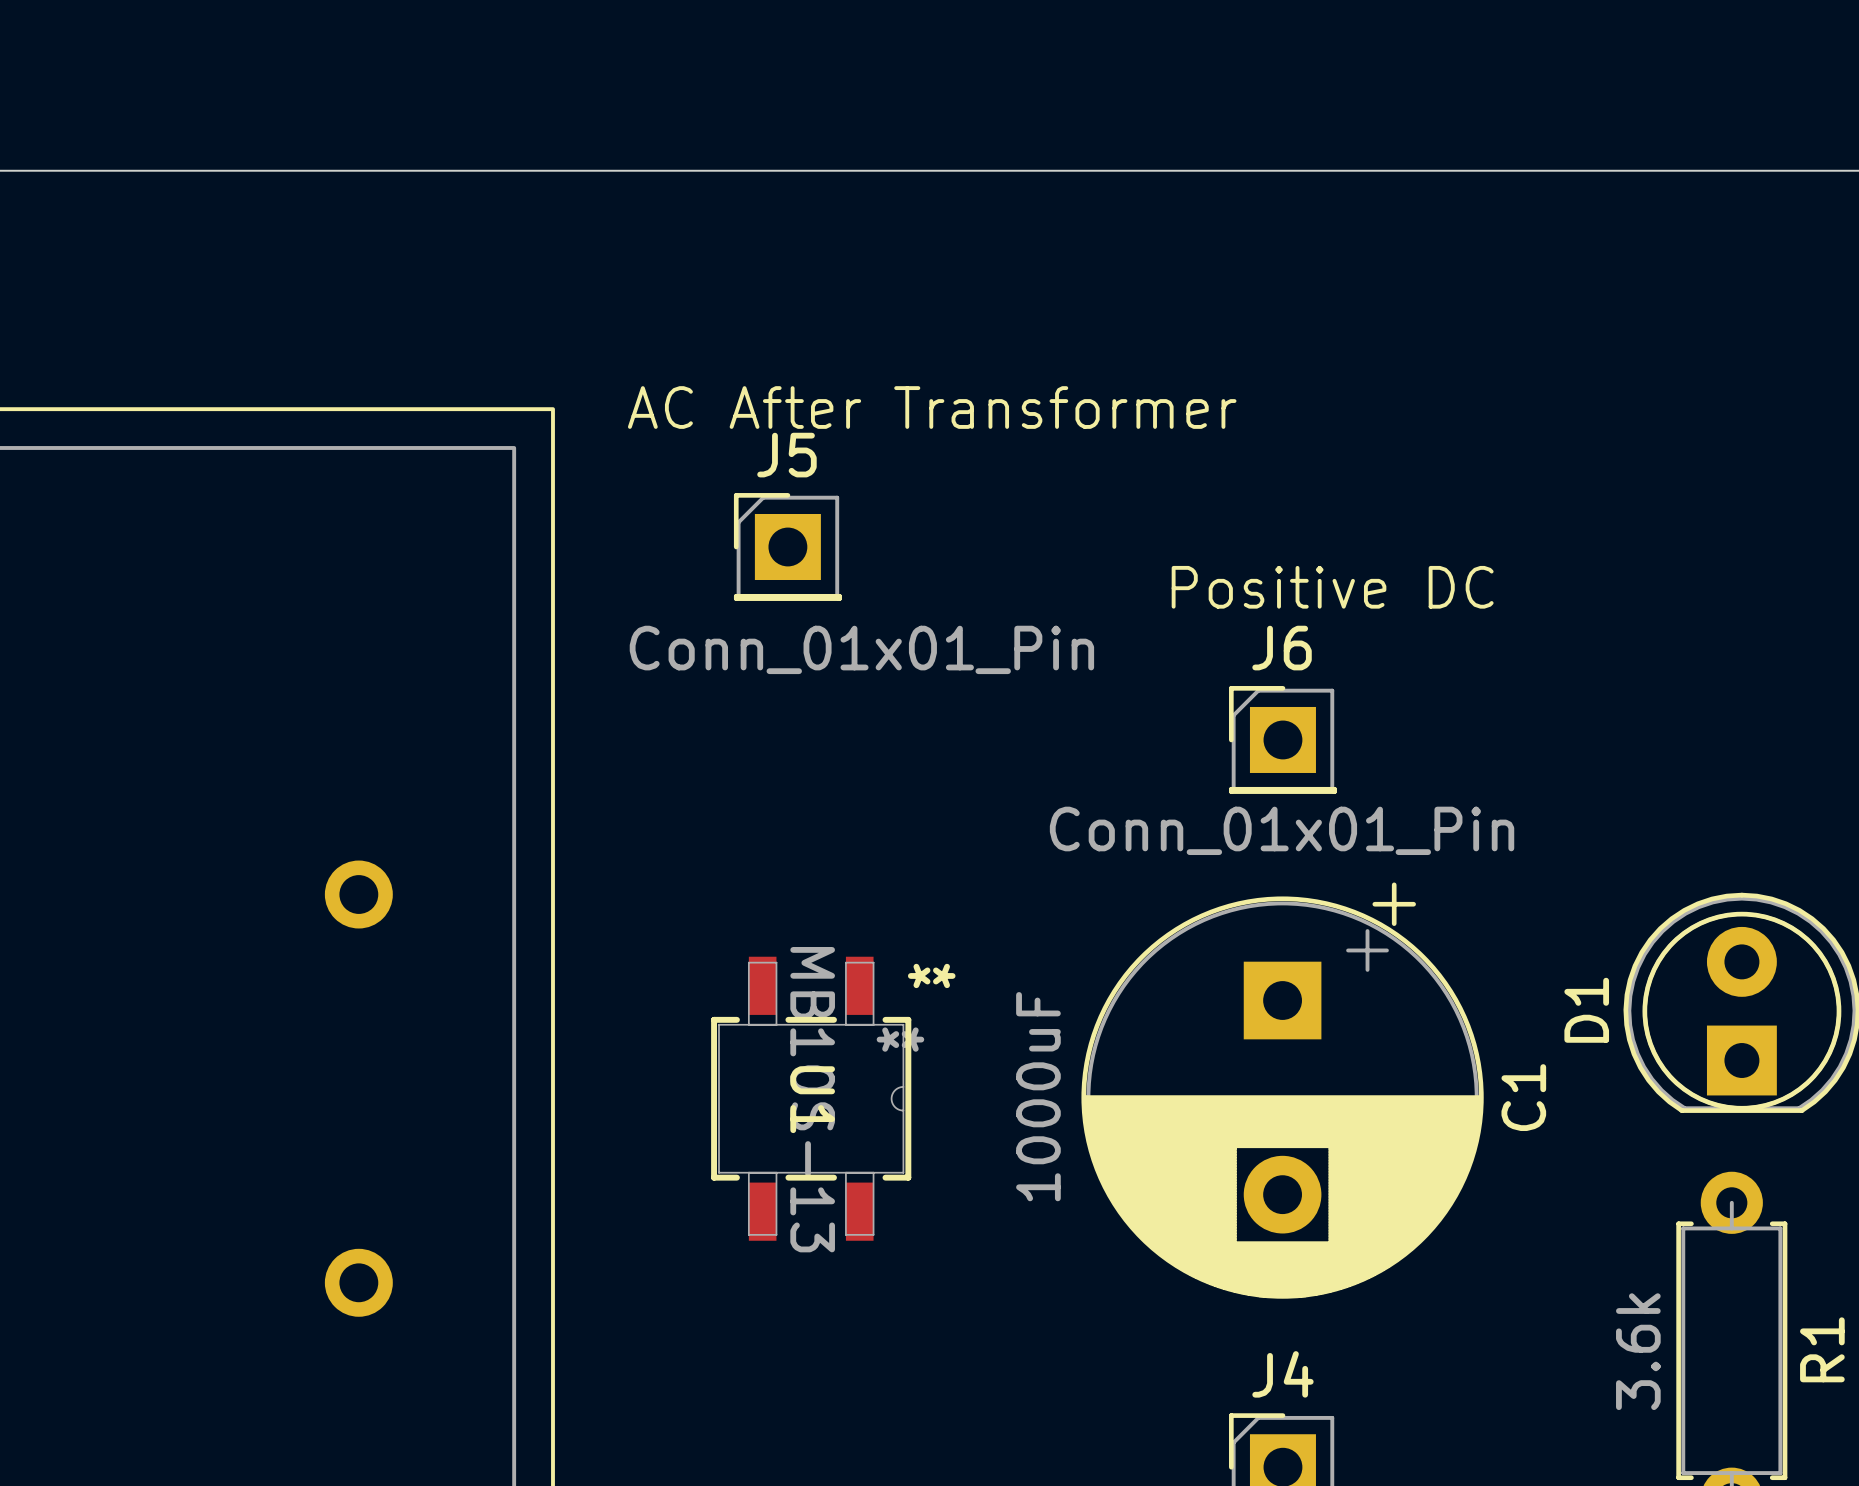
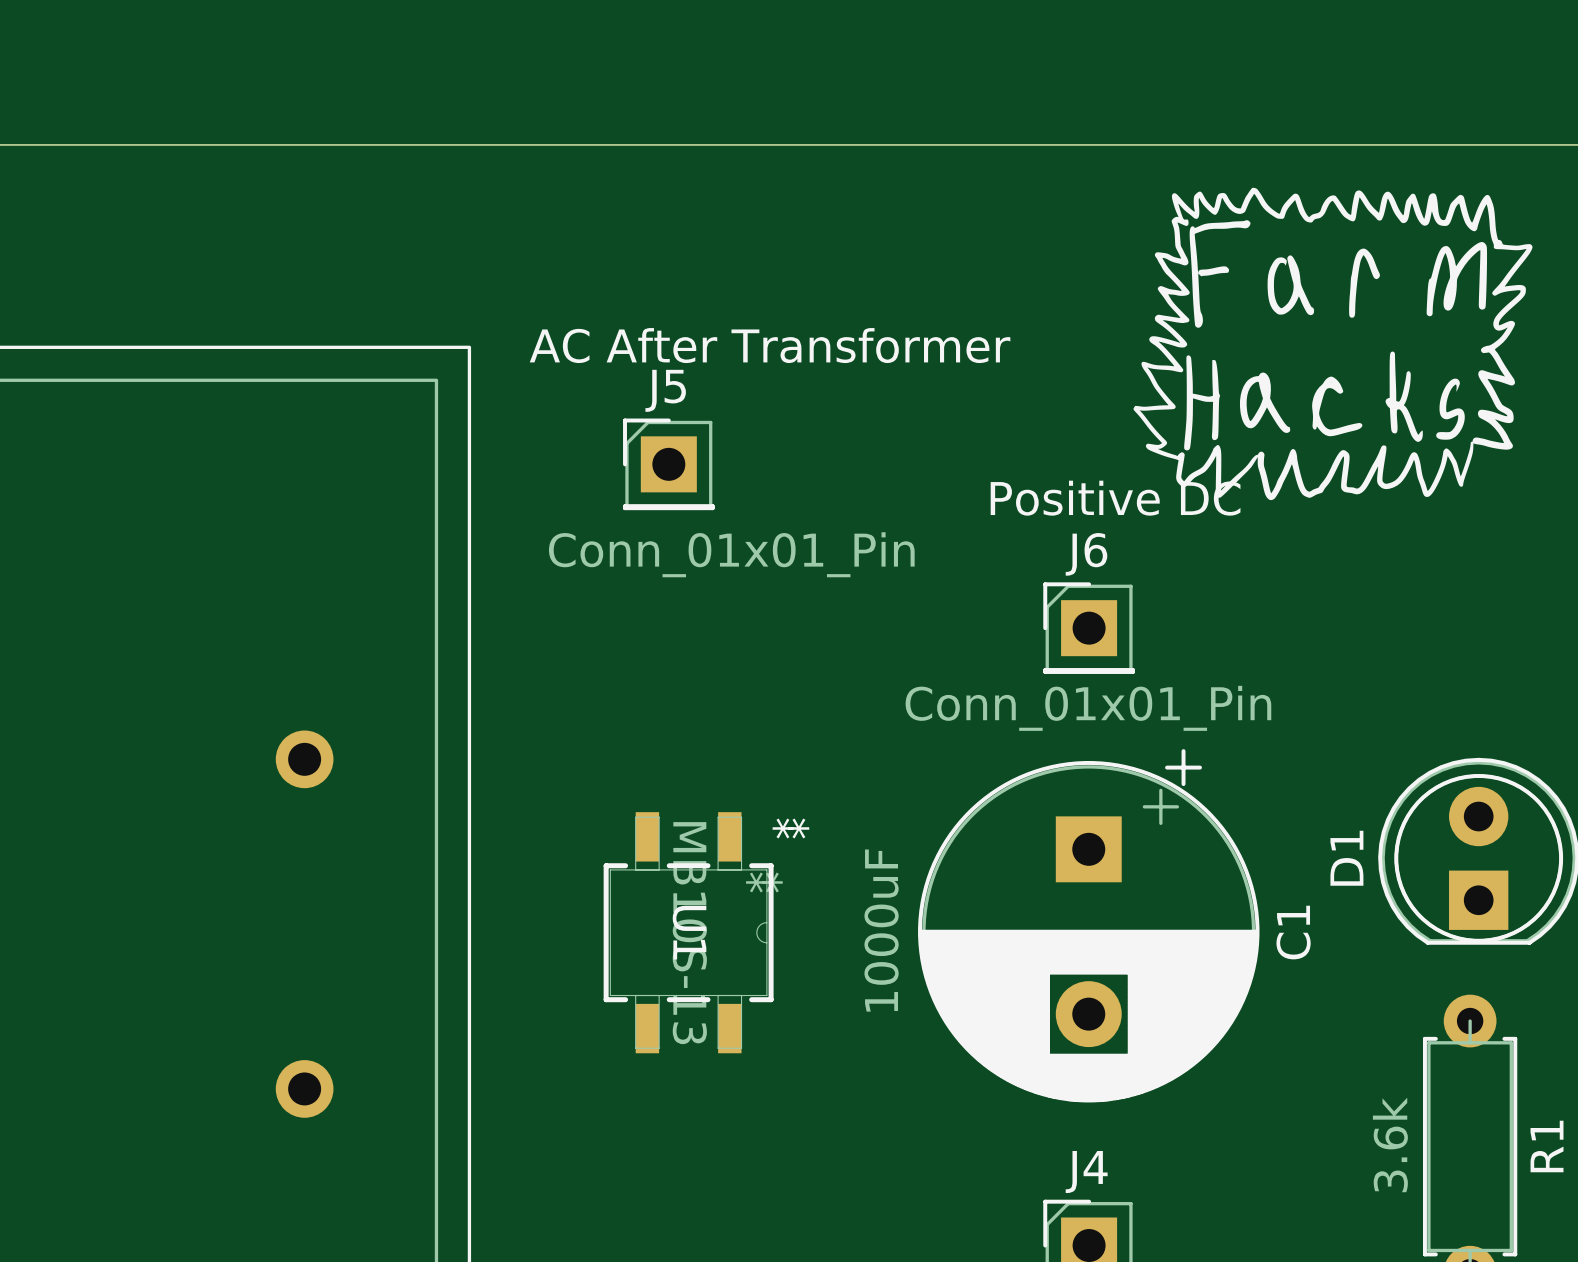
drawing: none -> [1133, 187, 1533, 501]

